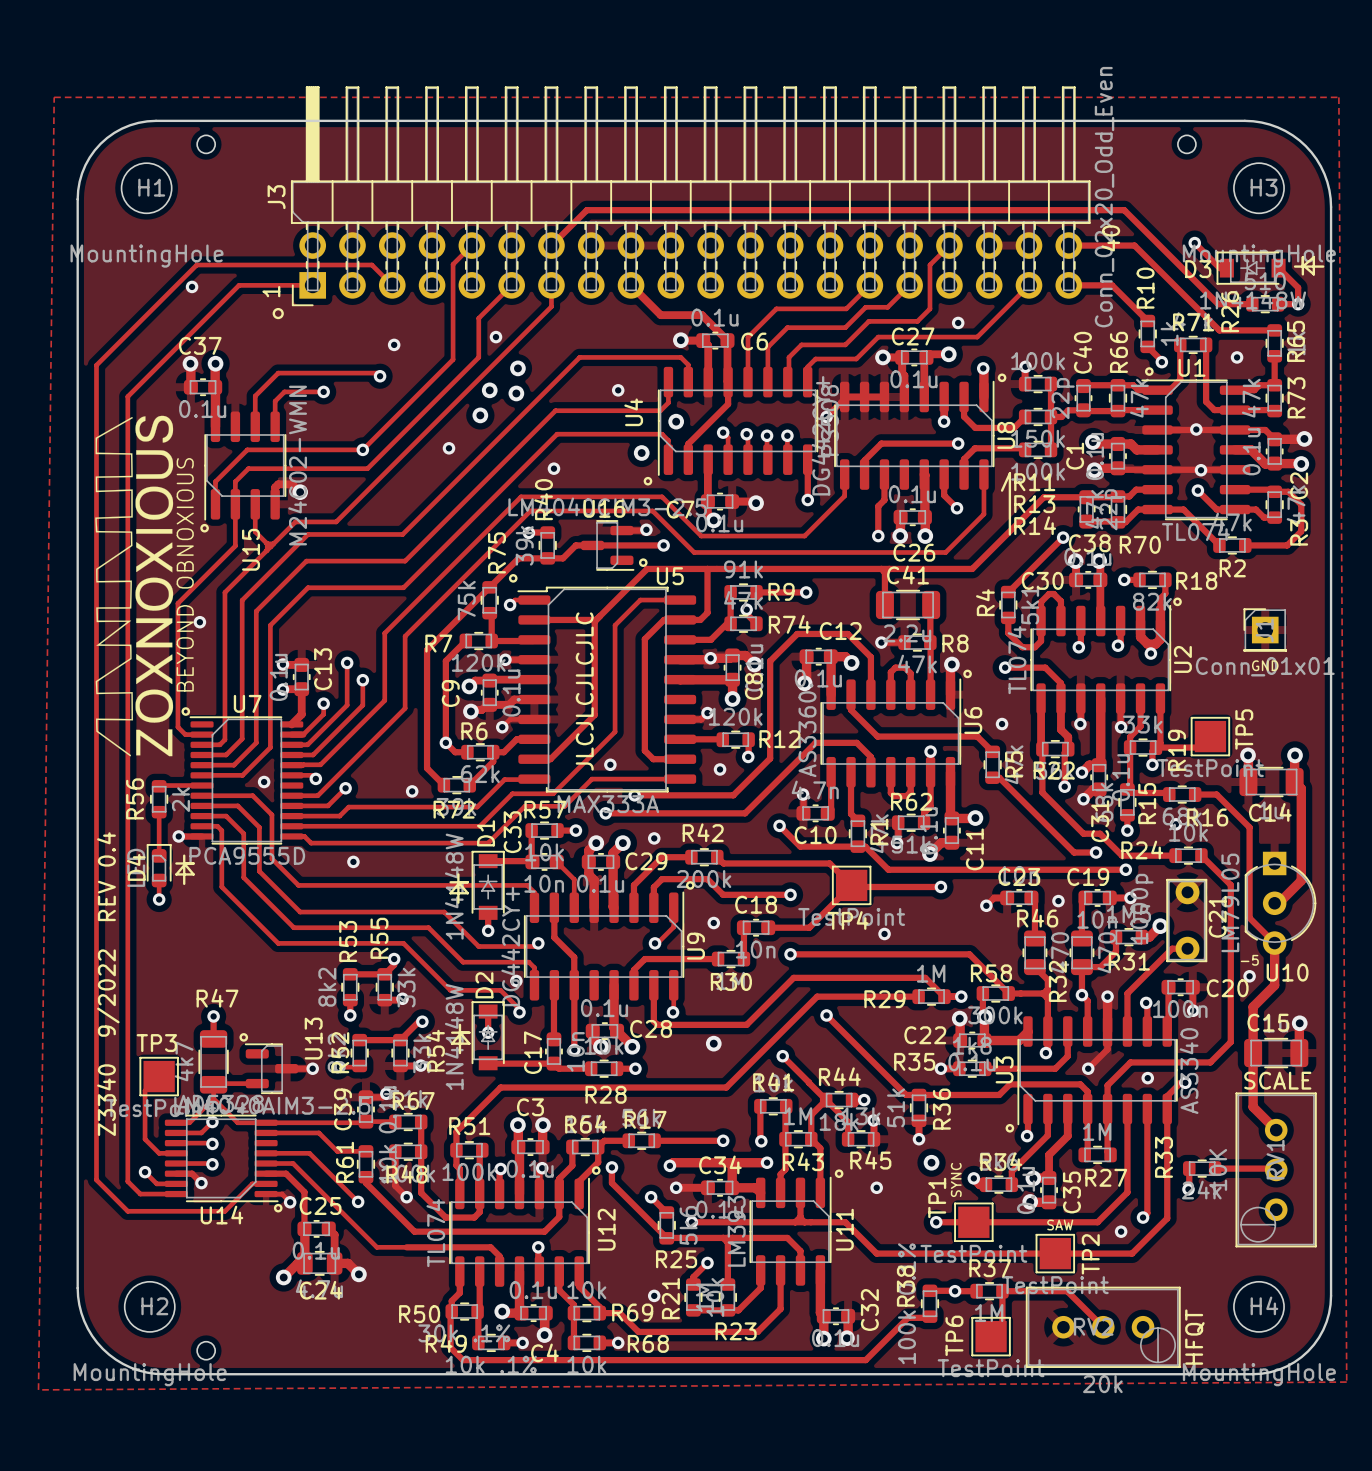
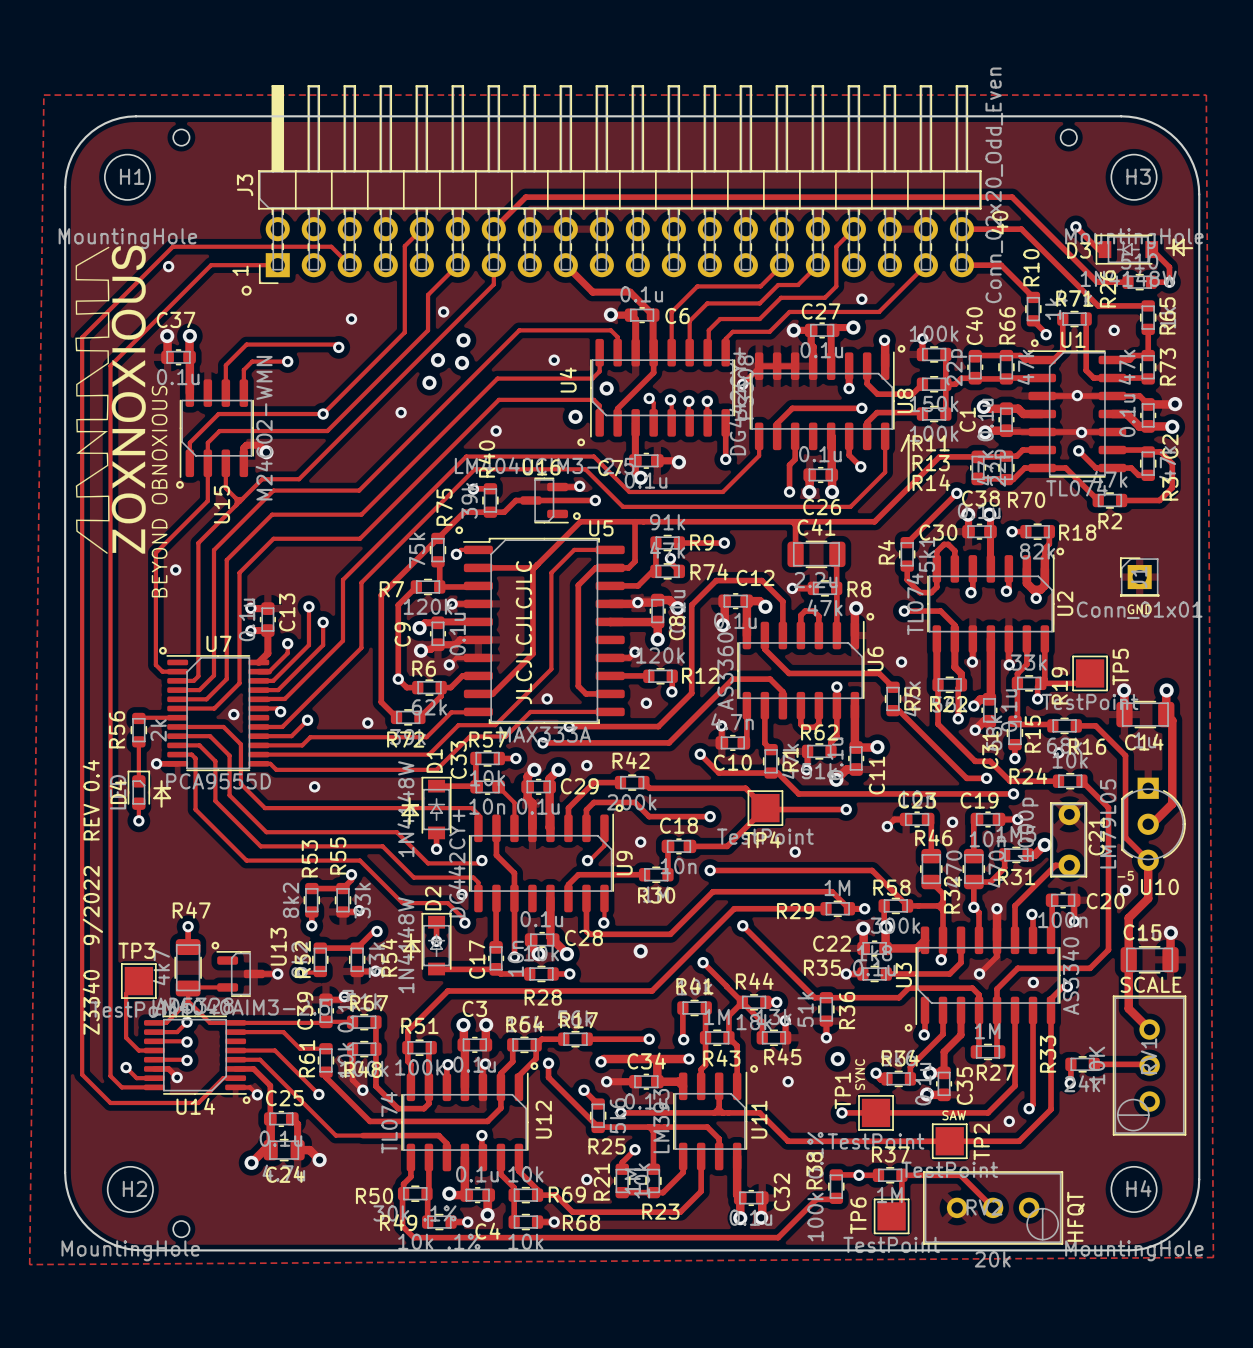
text position: BEYOND OBNOXIOUS (185, 574) -> BEYOND OBNOXIOUS (159, 491)
drawing position: (134, 586) -> (110, 399)

